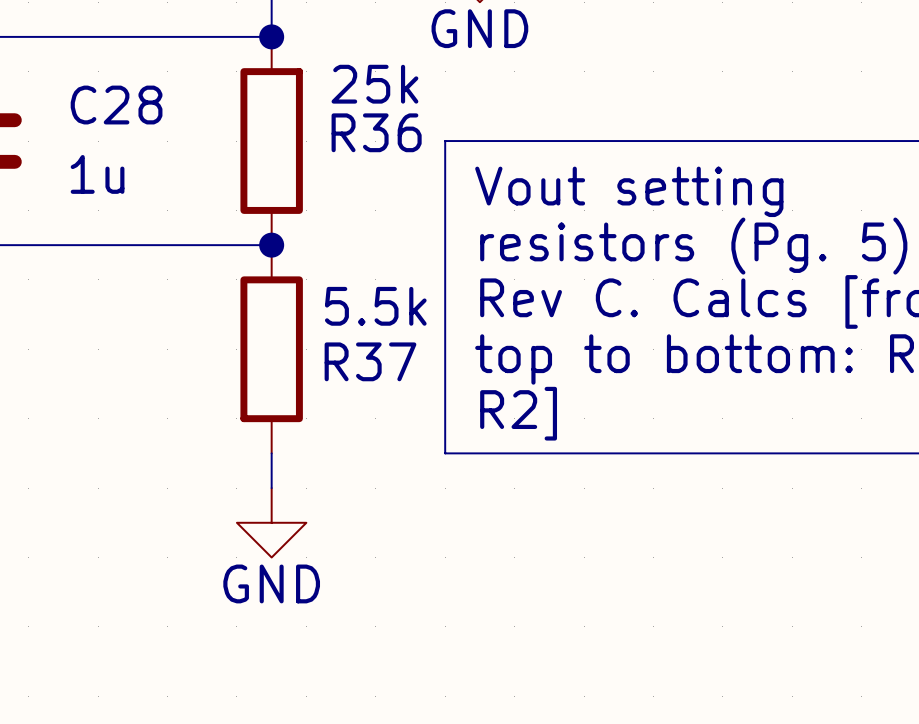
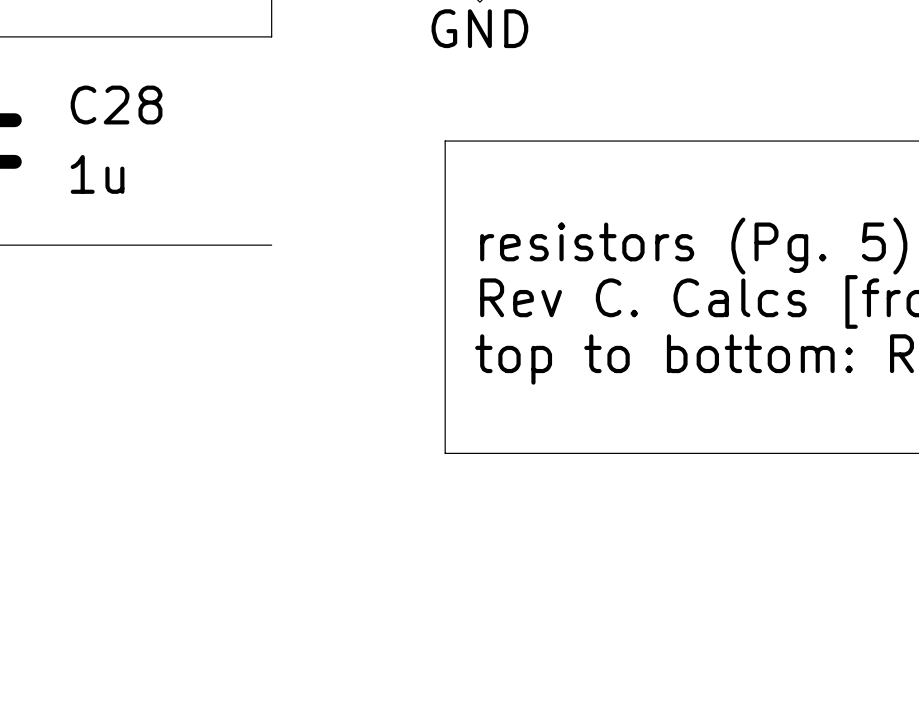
junction: (271, 36) -> none
R36: 25k (271, 141) -> none
text: Vout setting (629, 191) -> none
junction: (271, 245) -> none
R37: 5.5k (271, 349) -> none
text: R2] (518, 413) -> none
wire: (271, 453) (271, 488) -> none
power symbol: GND (271, 522) -> none

